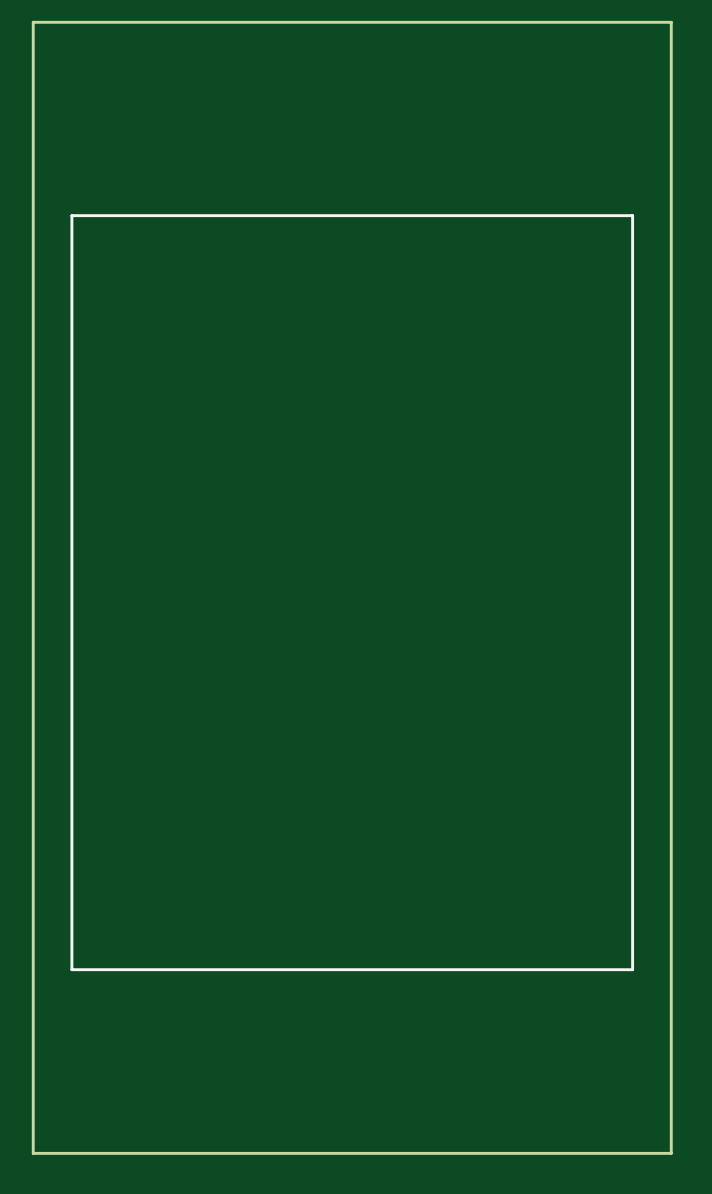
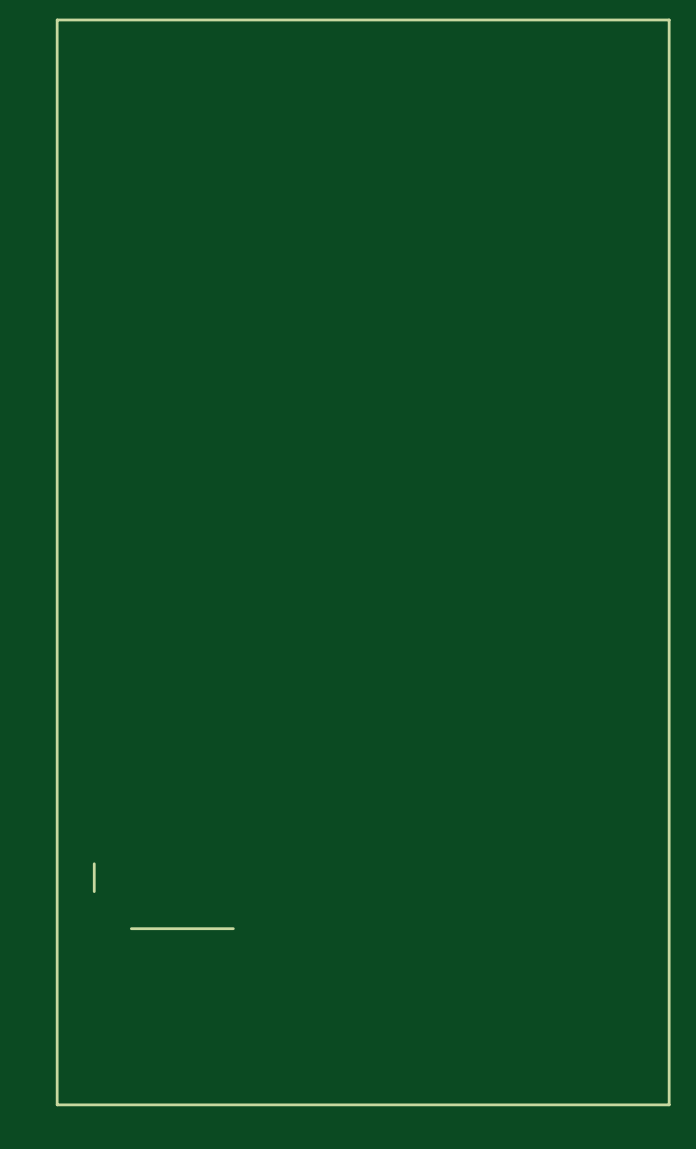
line: (71, 215) (632, 215) (632, 969) (71, 969) (71, 215) -> none
board edge: none -> (94, 863) (94, 891)
board edge: none -> (131, 928) (233, 928)

